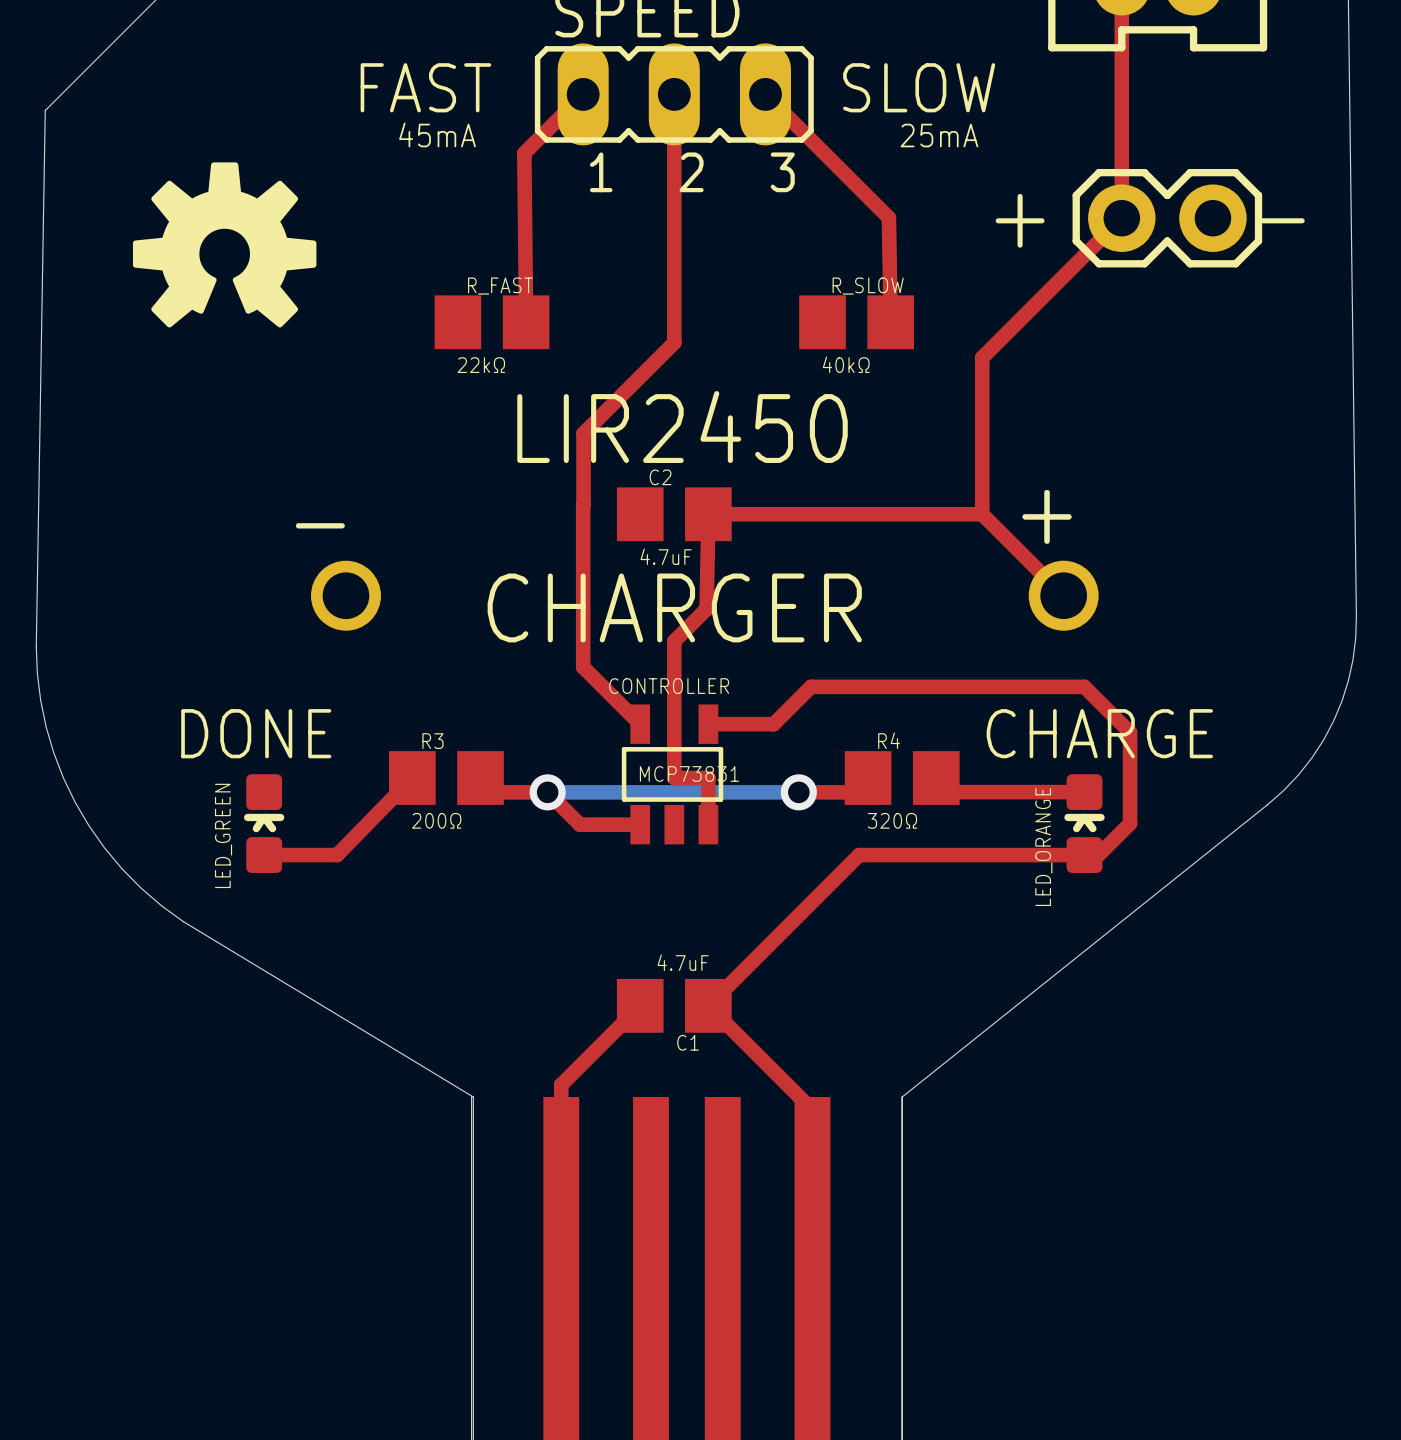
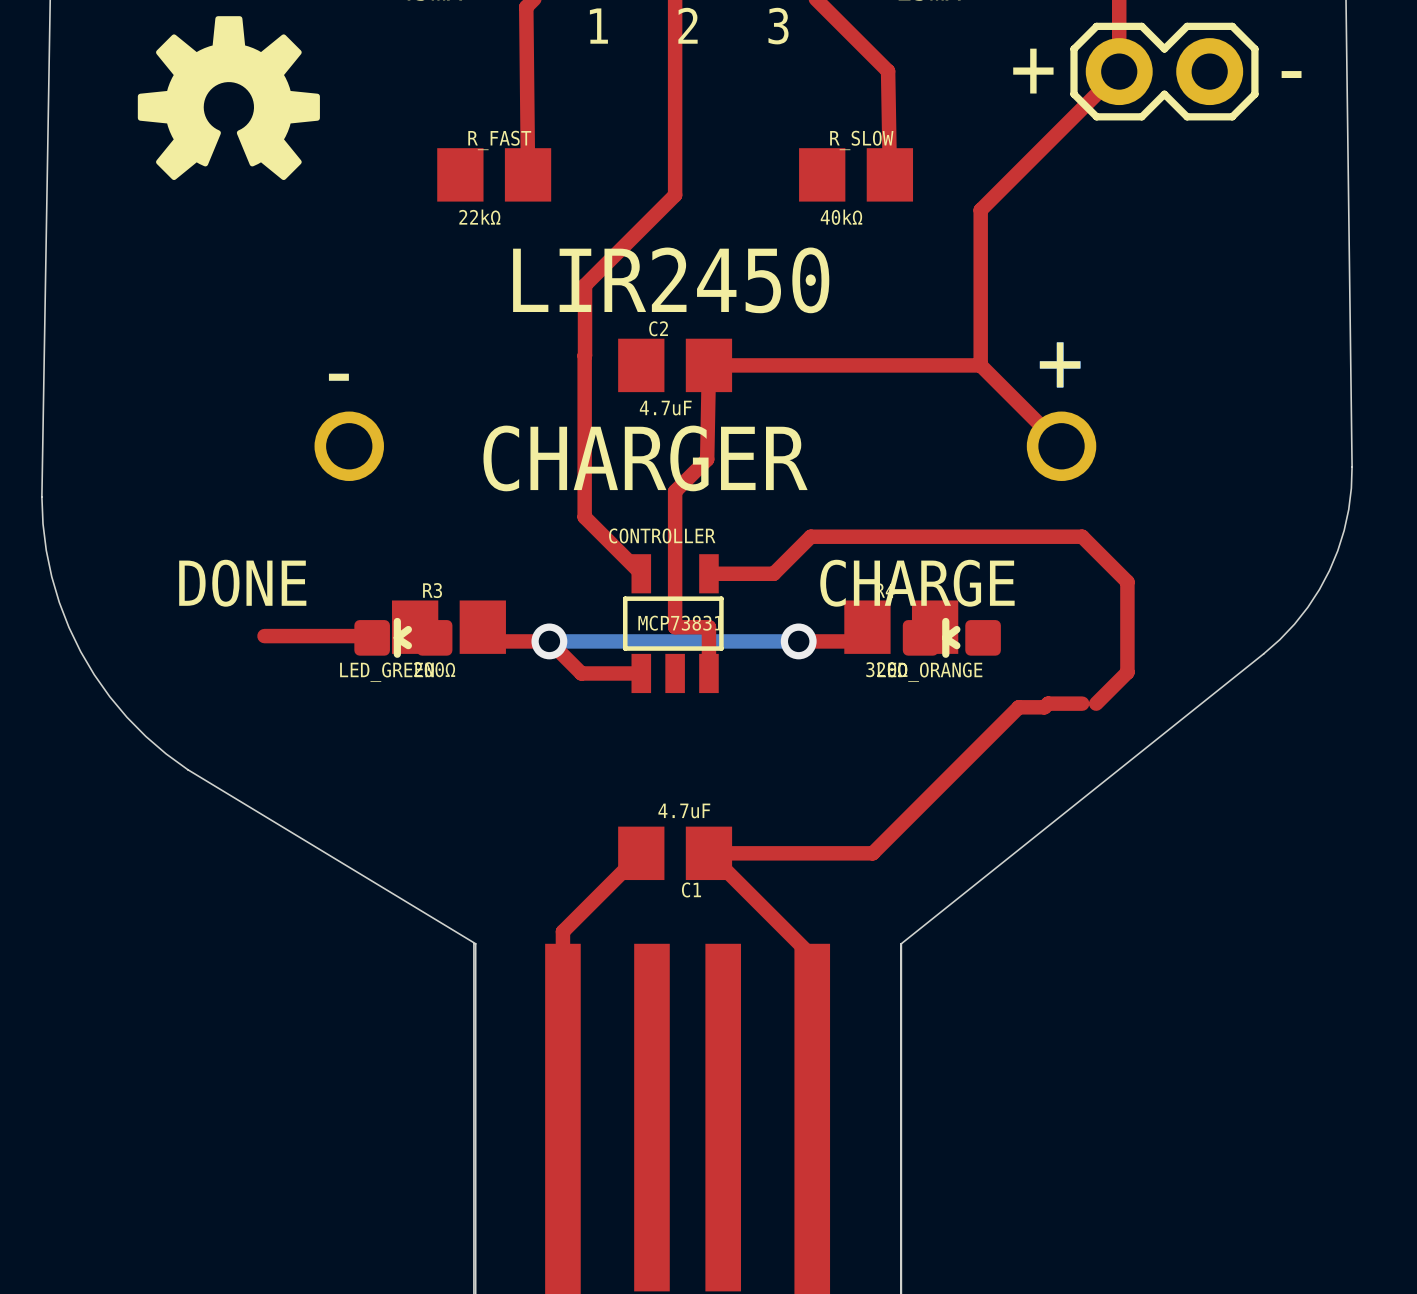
text position: CHARGE (1099, 733) -> CHARGE (917, 583)
top track: (412, 778) (337, 855) (264, 855) -> none
top track: (936, 778) (948, 792) (1084, 792) -> none
top track: none -> (264, 636) (370, 636) (372, 637)
LED_GREEN rotation: 0° (264, 823) -> 90° counterclockwise (403, 637)
LED_GREEN position: (264, 823) -> (403, 637)
LED_ORANGE rotation: 0° (1084, 823) -> 90° counterclockwise (951, 637)
LED_ORANGE position: (1084, 823) -> (951, 637)
top track: (1050, 855) (859, 855) (708, 1005) -> (1048, 703) (1044, 707) (1018, 707) (872, 853) (708, 853)

